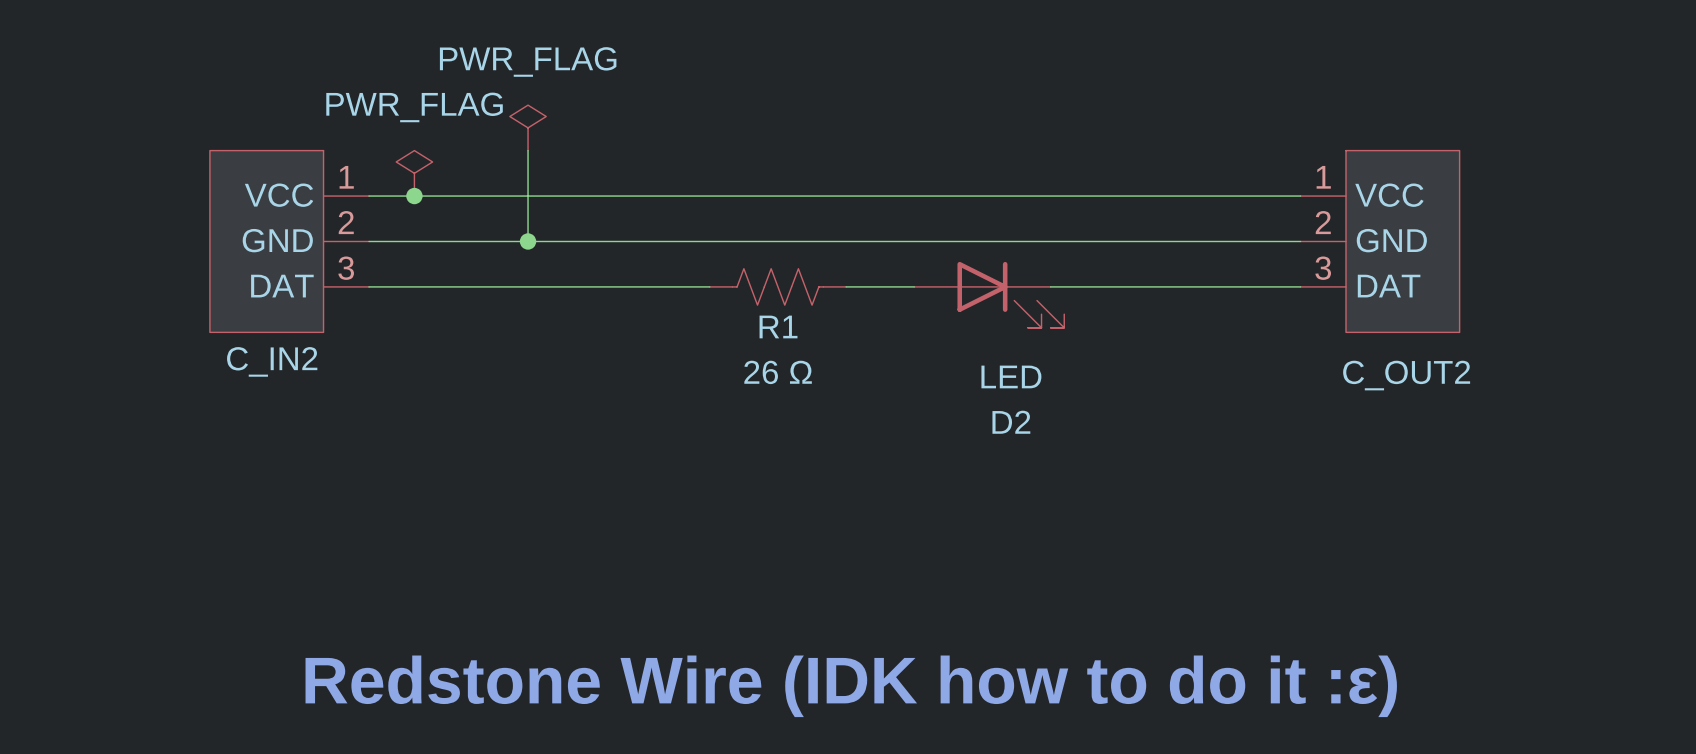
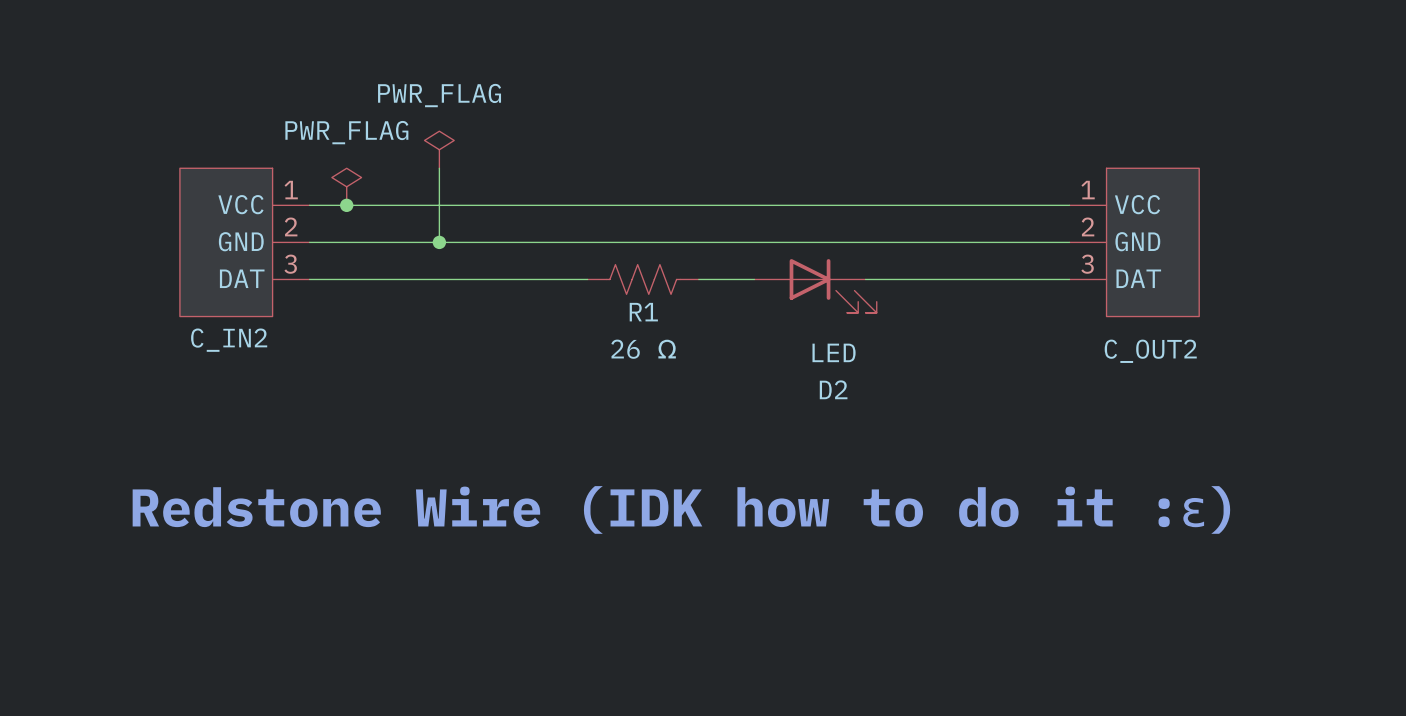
text position: Redstone Wire (IDK how to do it :ε) (851, 686) -> Redstone Wire (IDK how to do it :ε) (681, 509)

